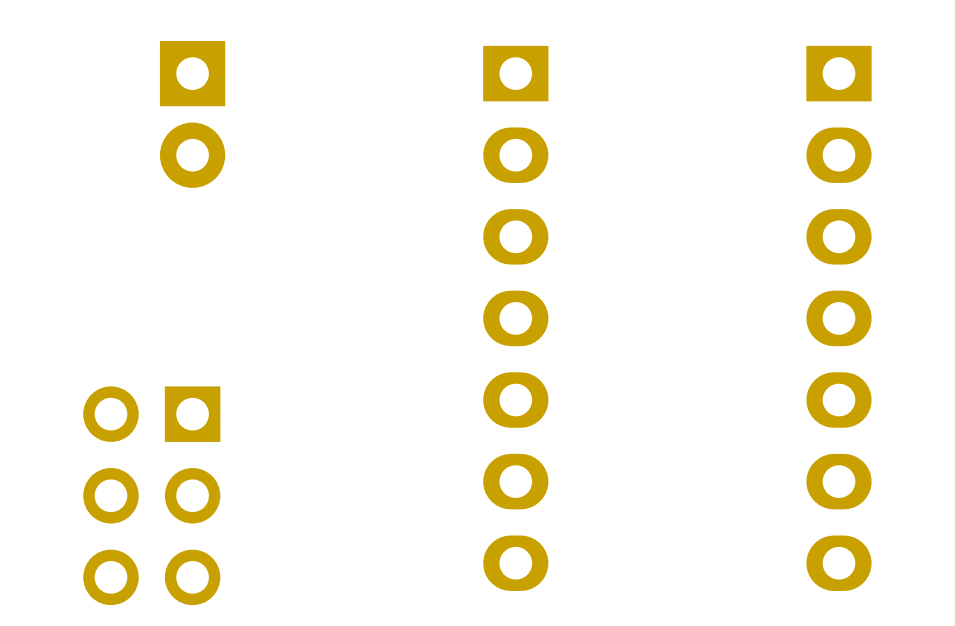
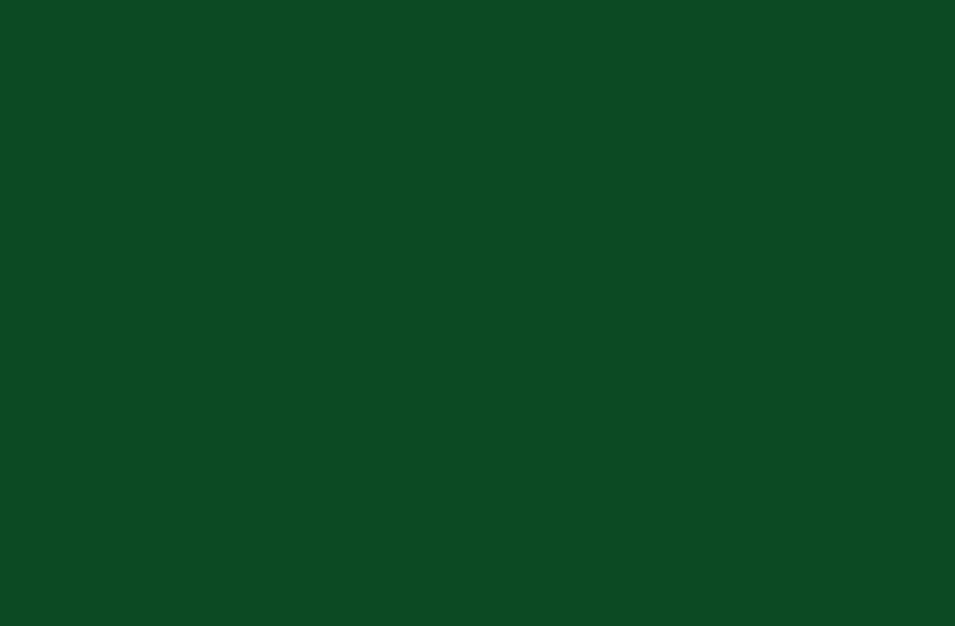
part: (192, 114) -> none
part: (515, 318) -> none
part: (838, 318) -> none
part: (151, 495) -> none

